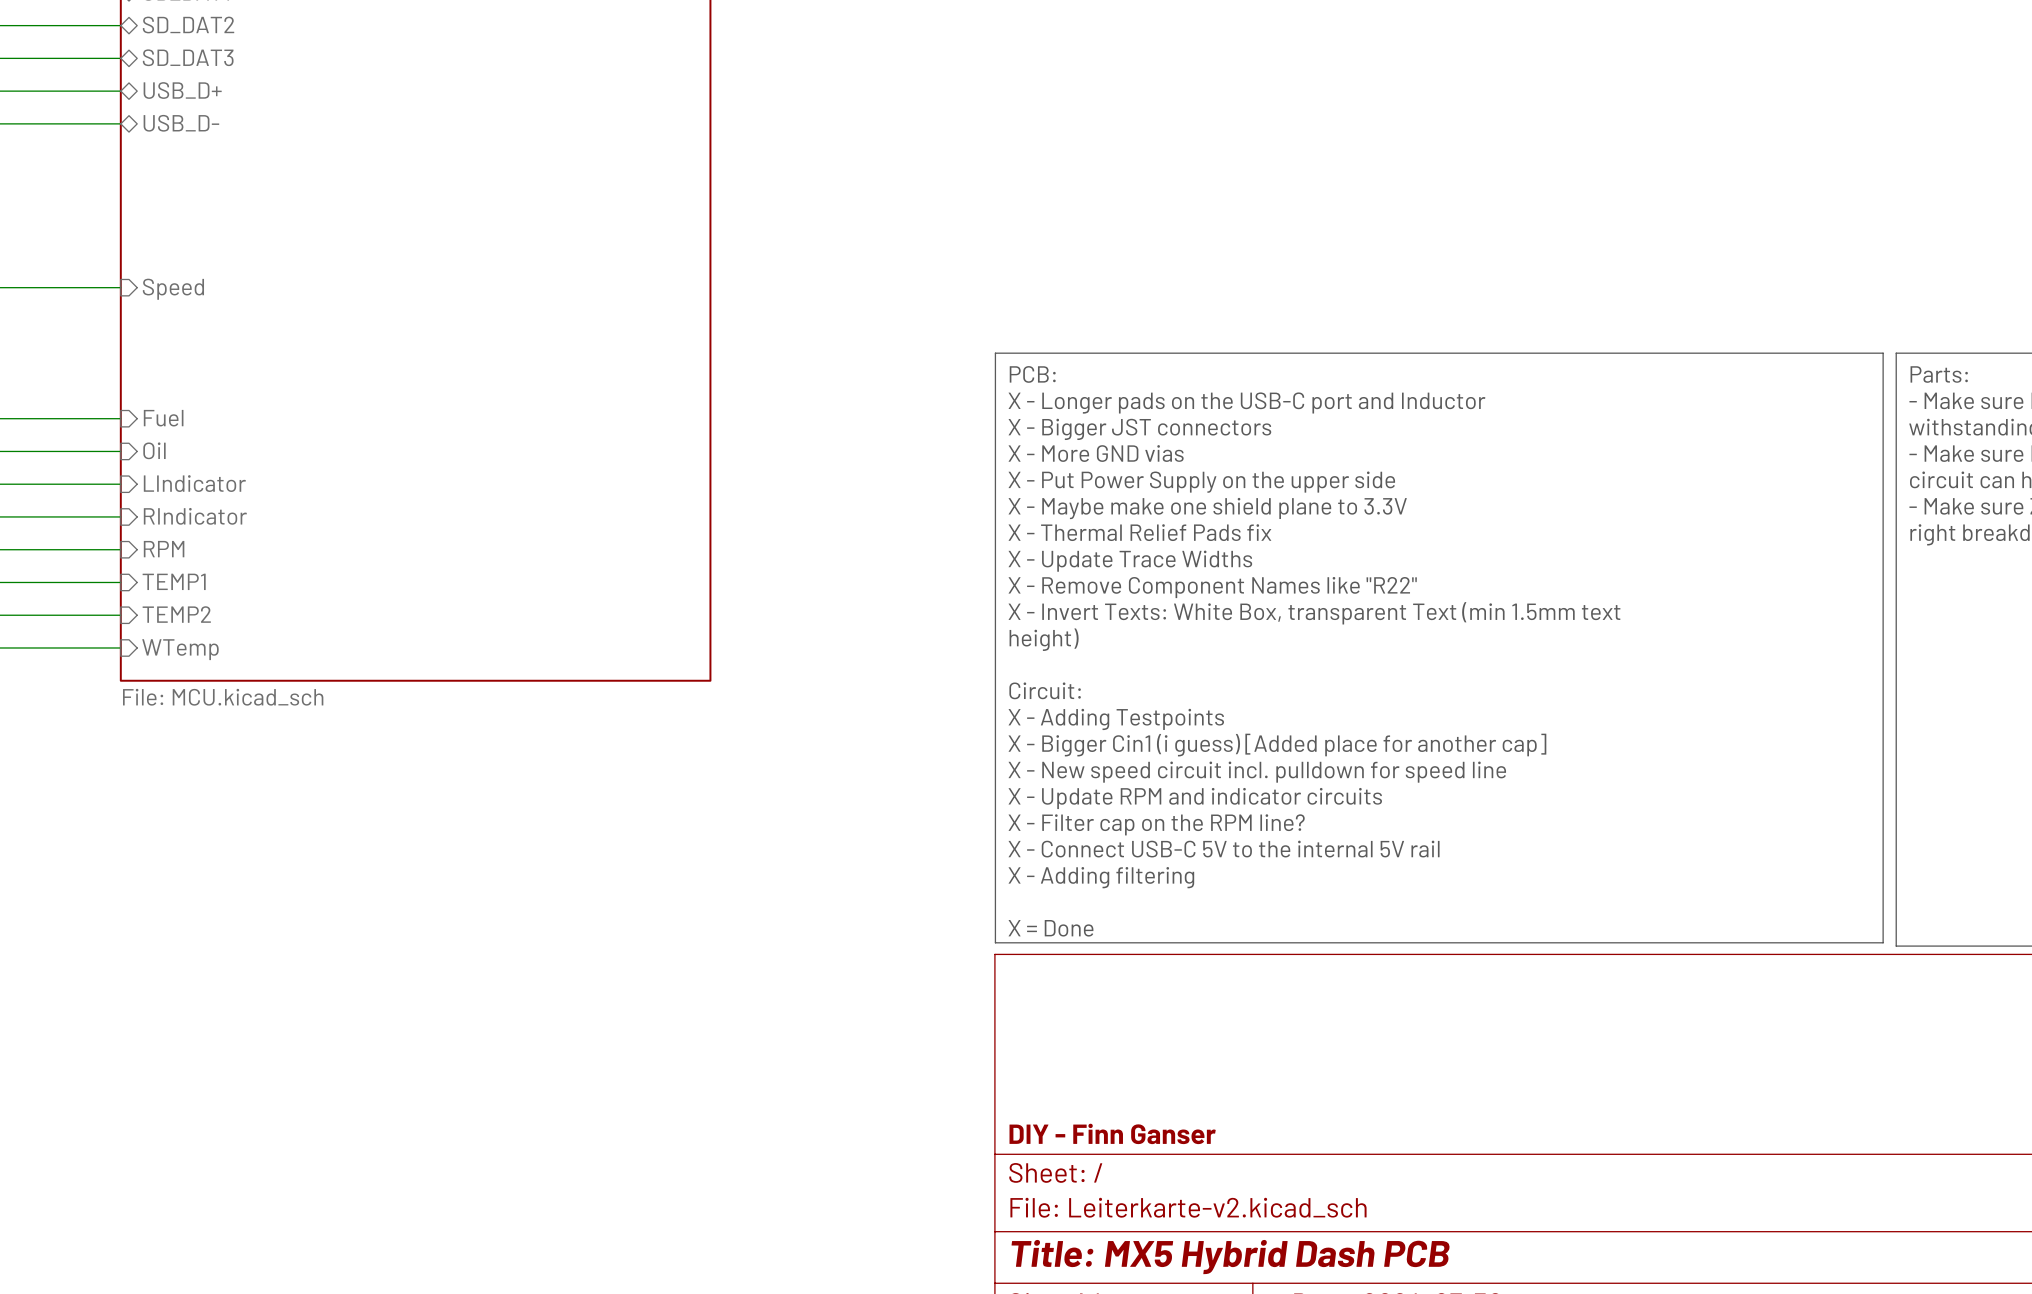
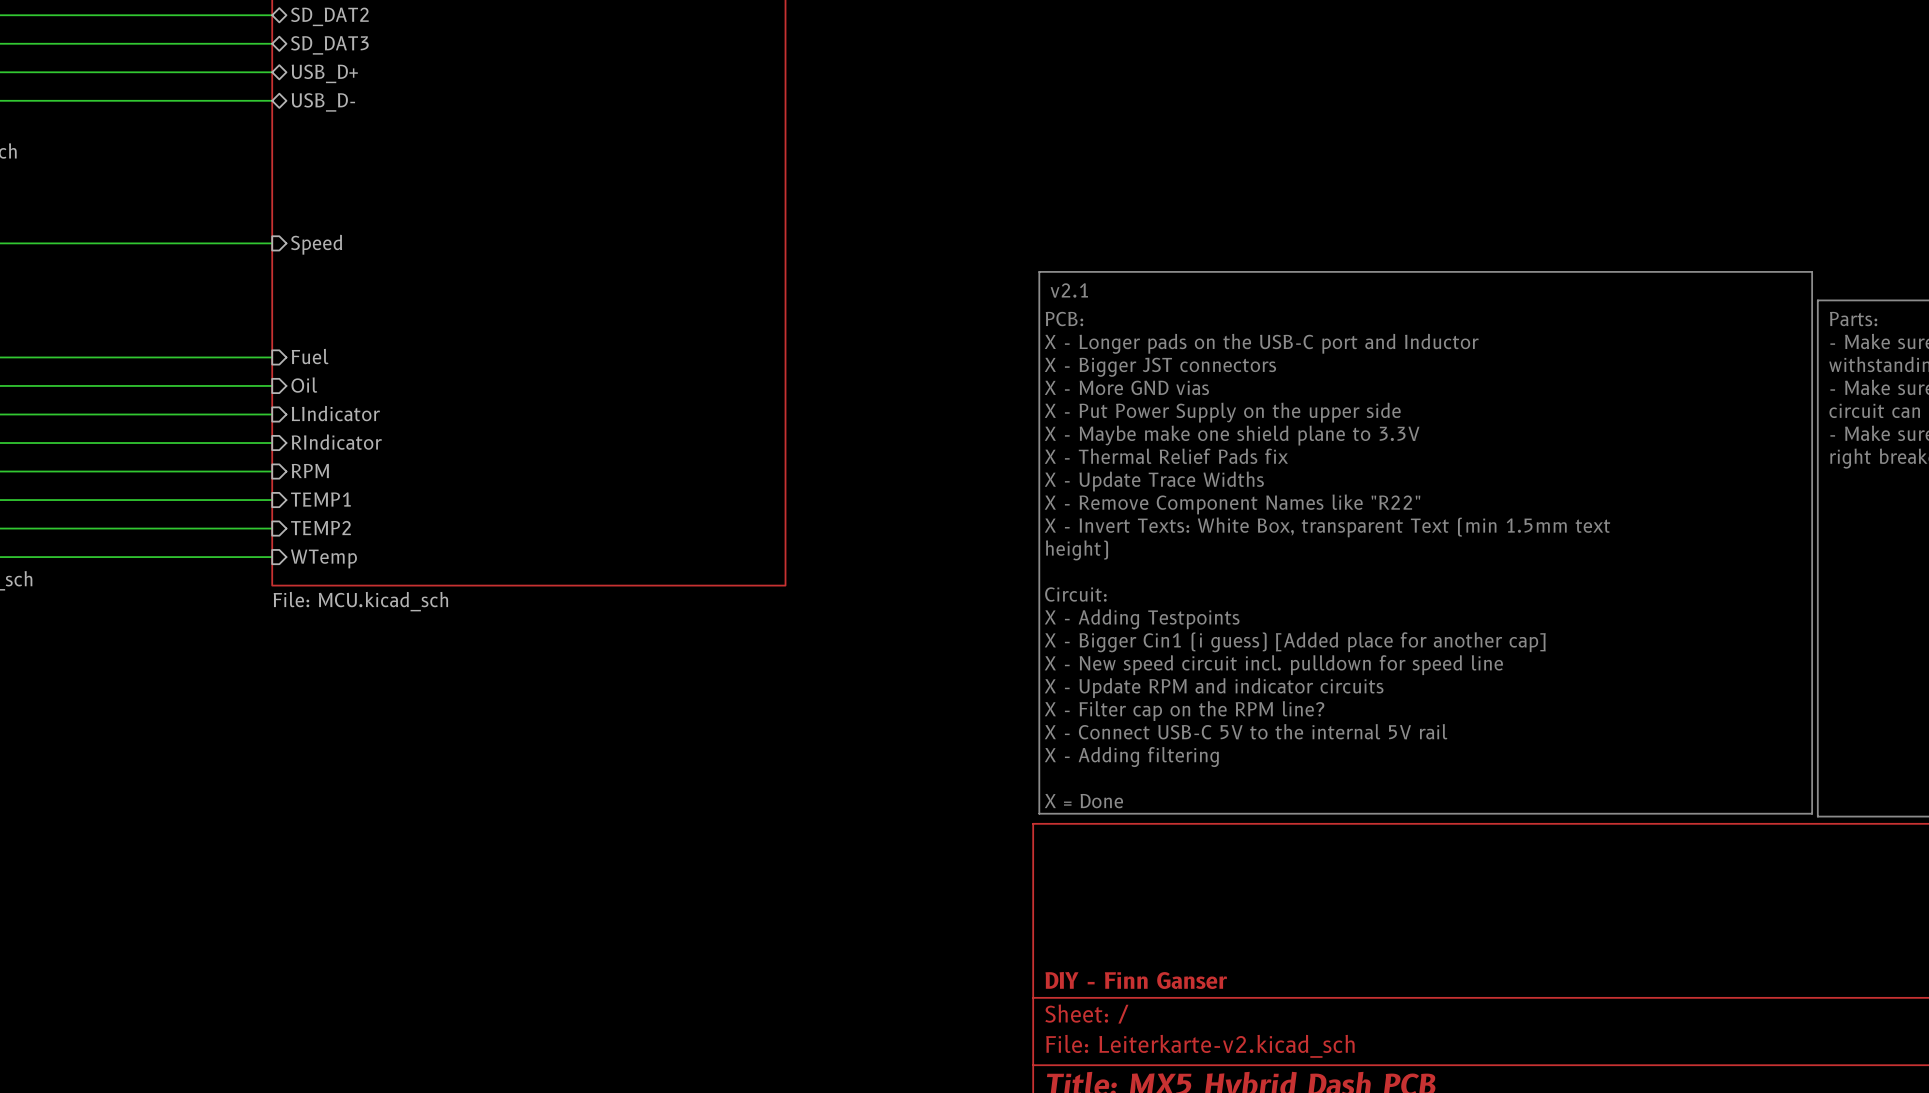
text: none -> v2.1 (1069, 290)
line: (1001, 942) (995, 942) (995, 353) (1883, 353) (1883, 942) -> (1039, 813) (1039, 271) (1812, 271) (1812, 813) (1806, 813)

